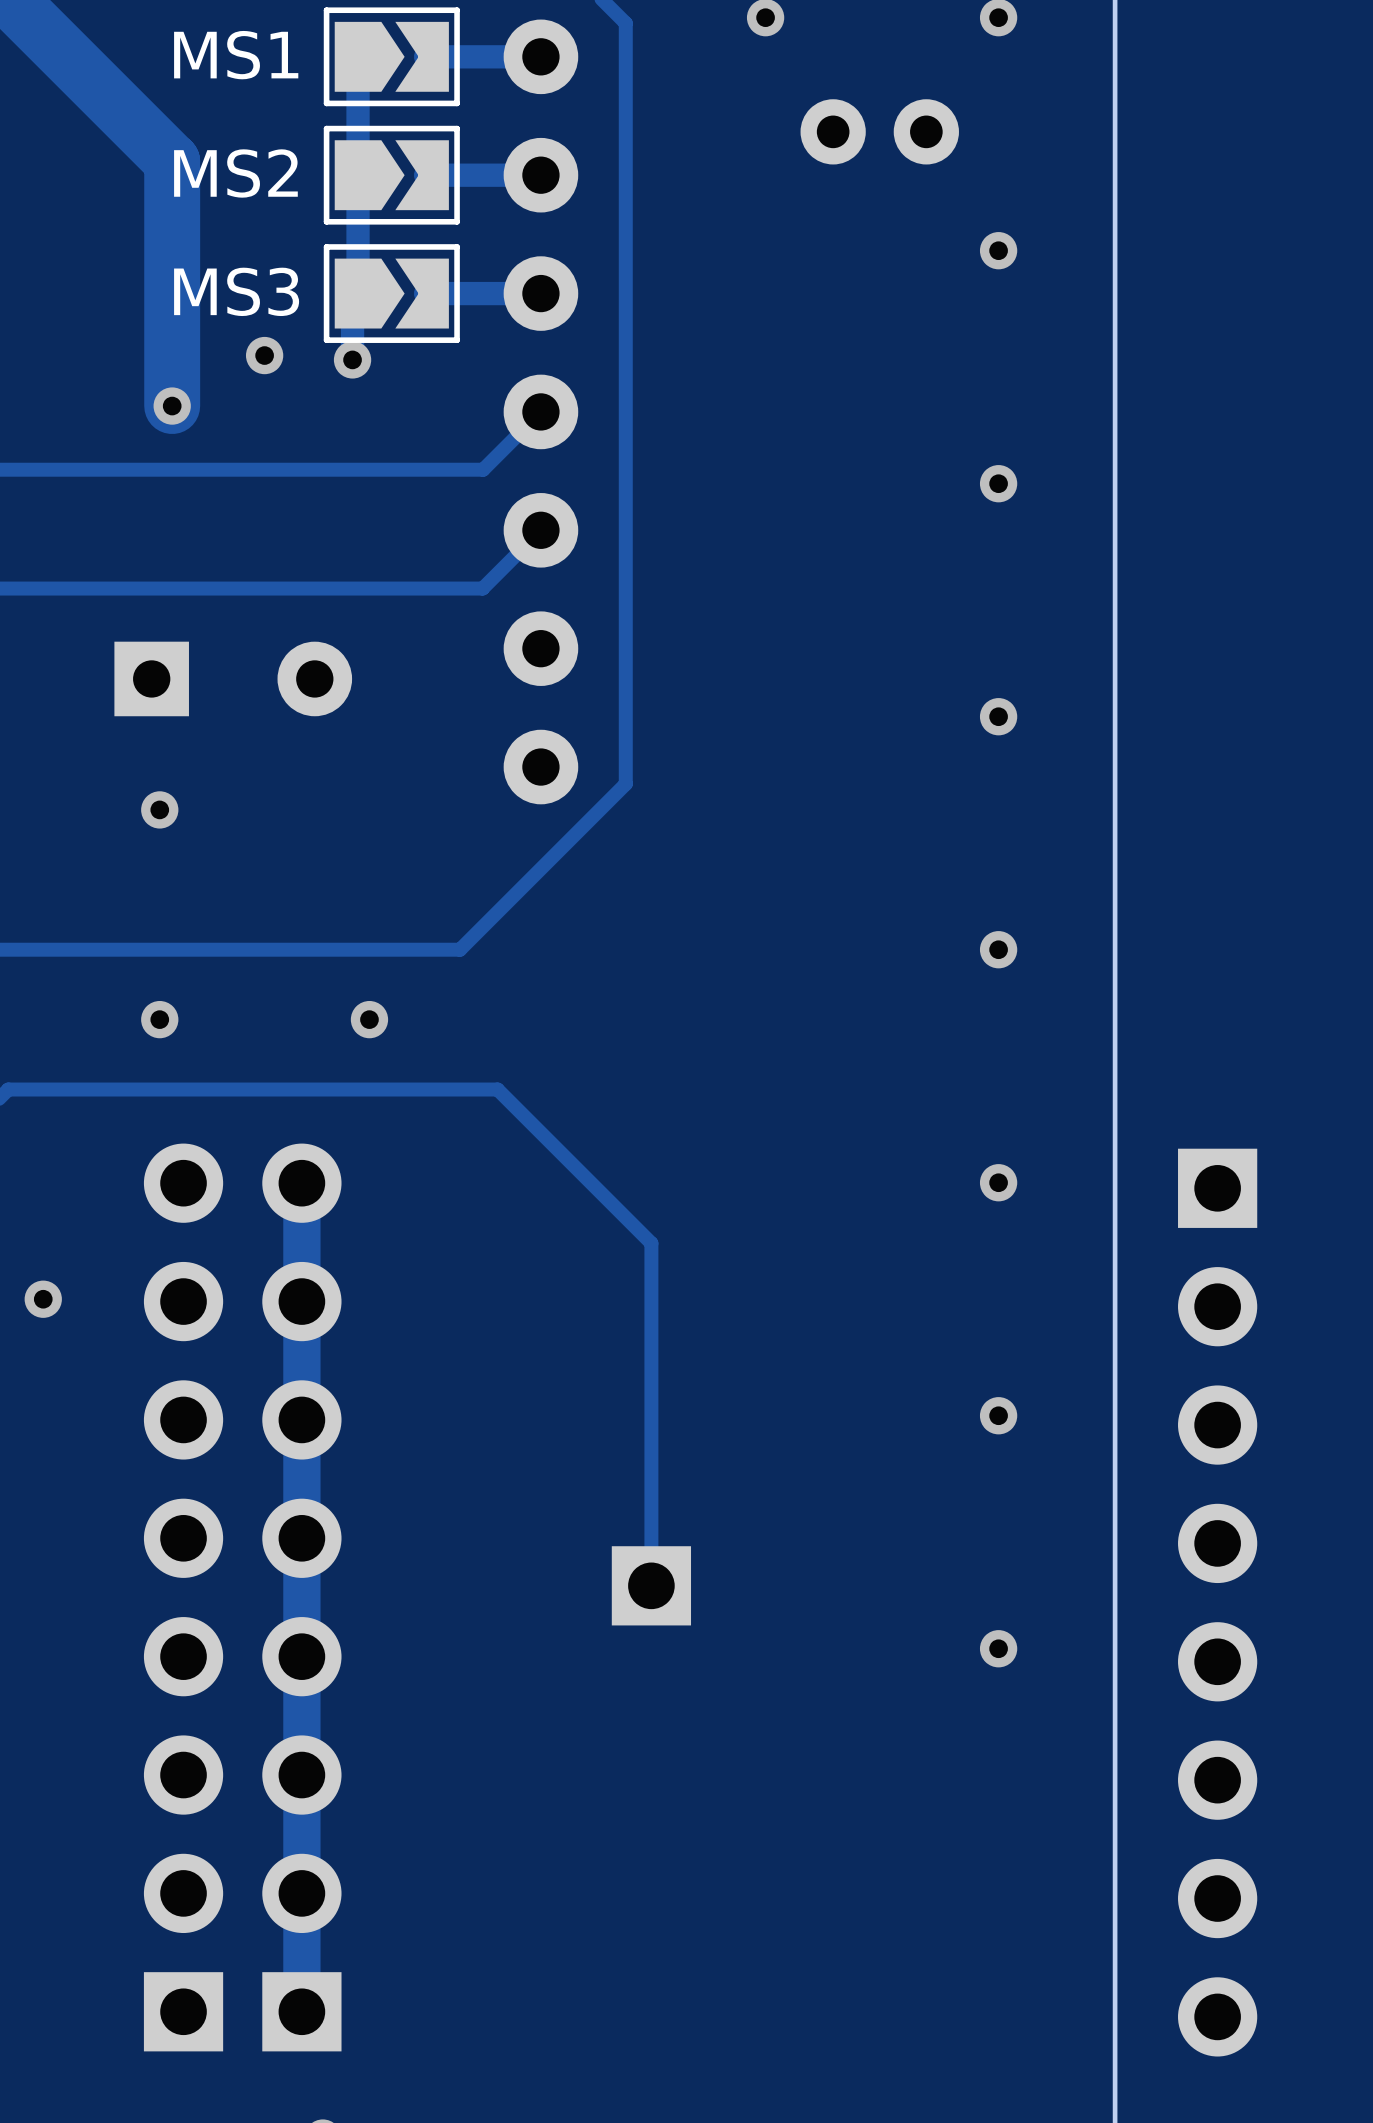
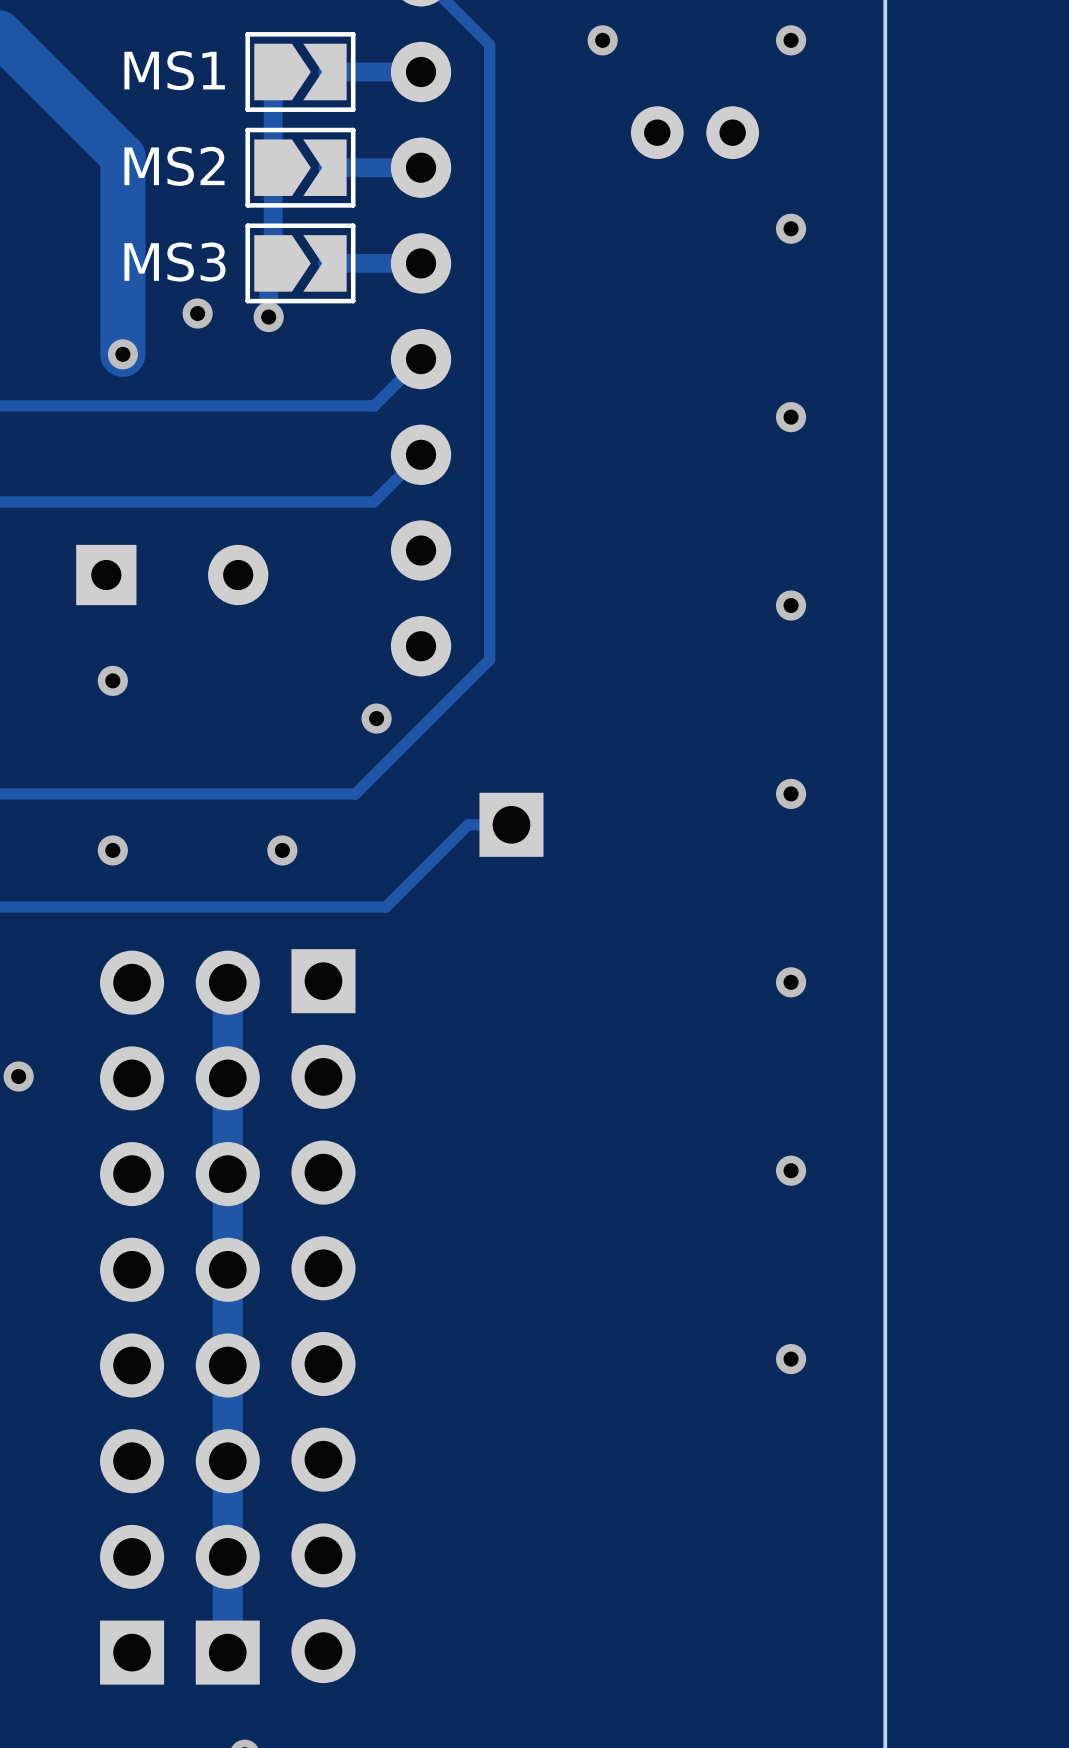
via: none -> (376, 718)
track: (497, 1089) (651, 1243) (651, 1585) -> (386, 906) (468, 824) (511, 824) (510, 825)
part position: (651, 1585) -> (511, 824)
part position: (1217, 1602) -> (323, 1316)

